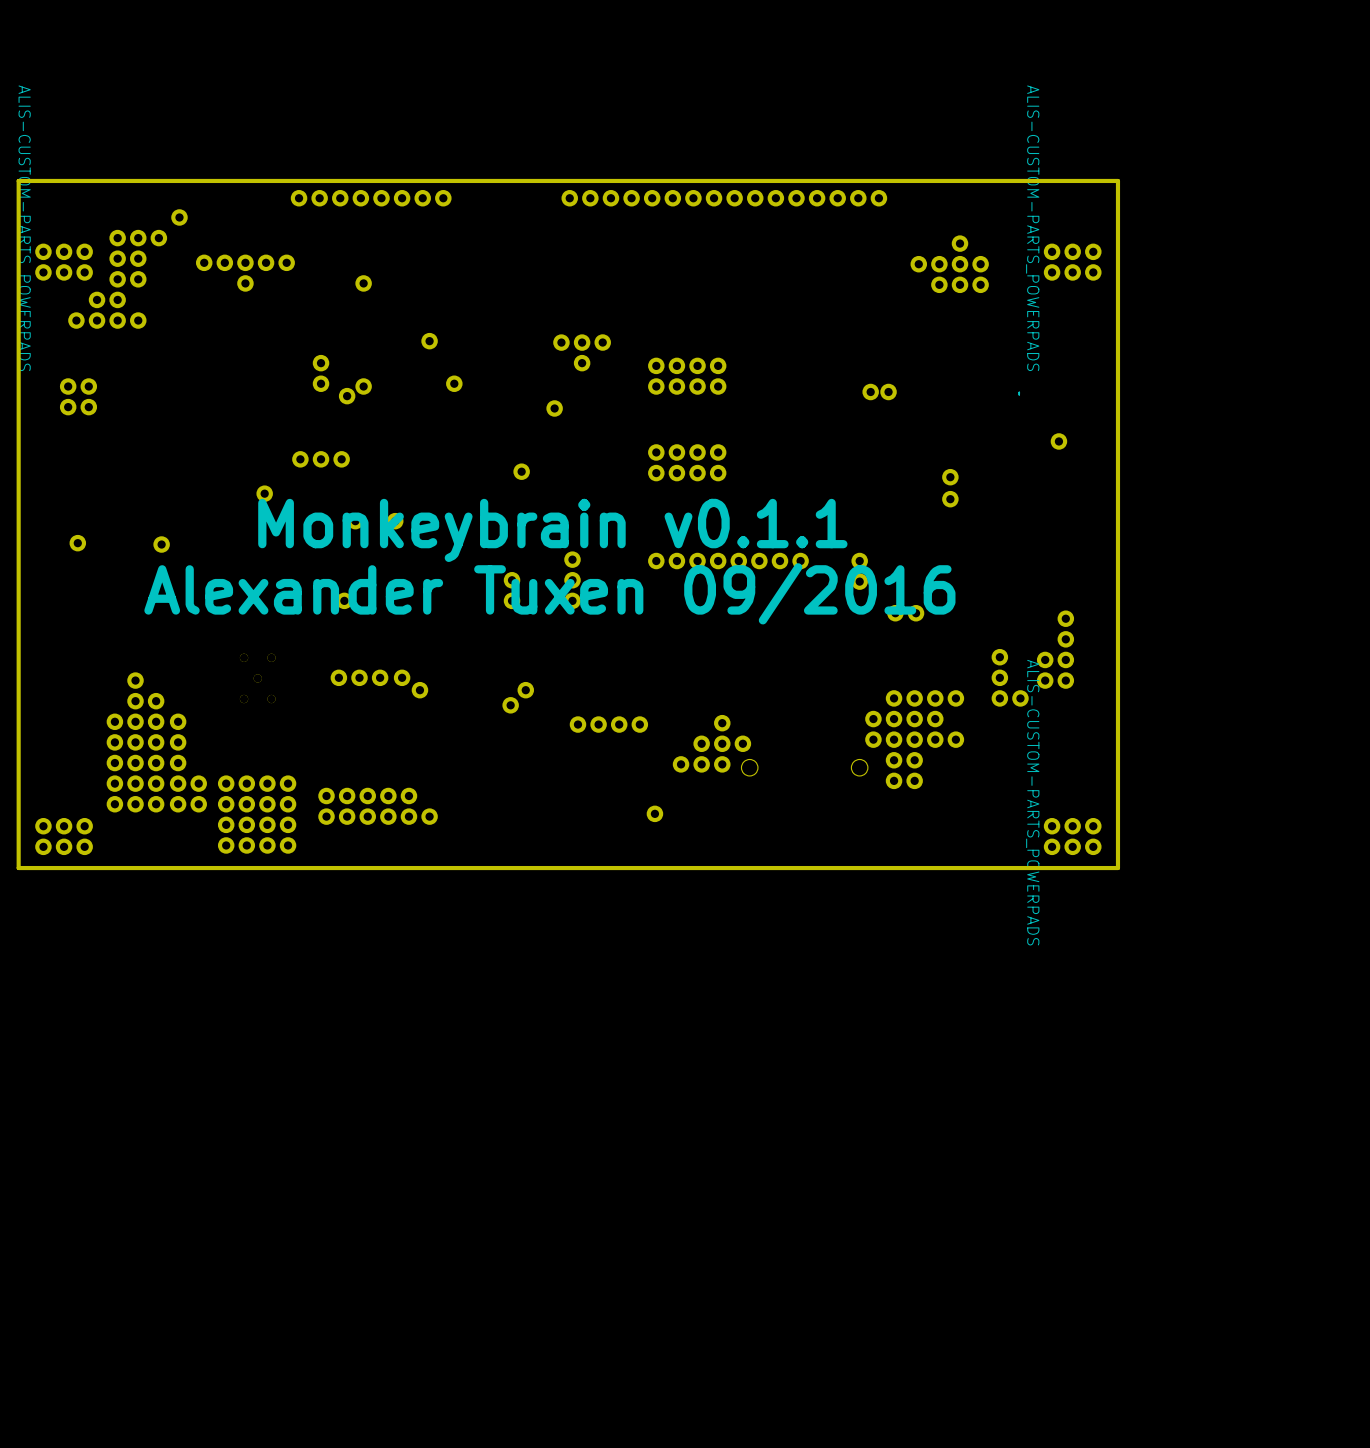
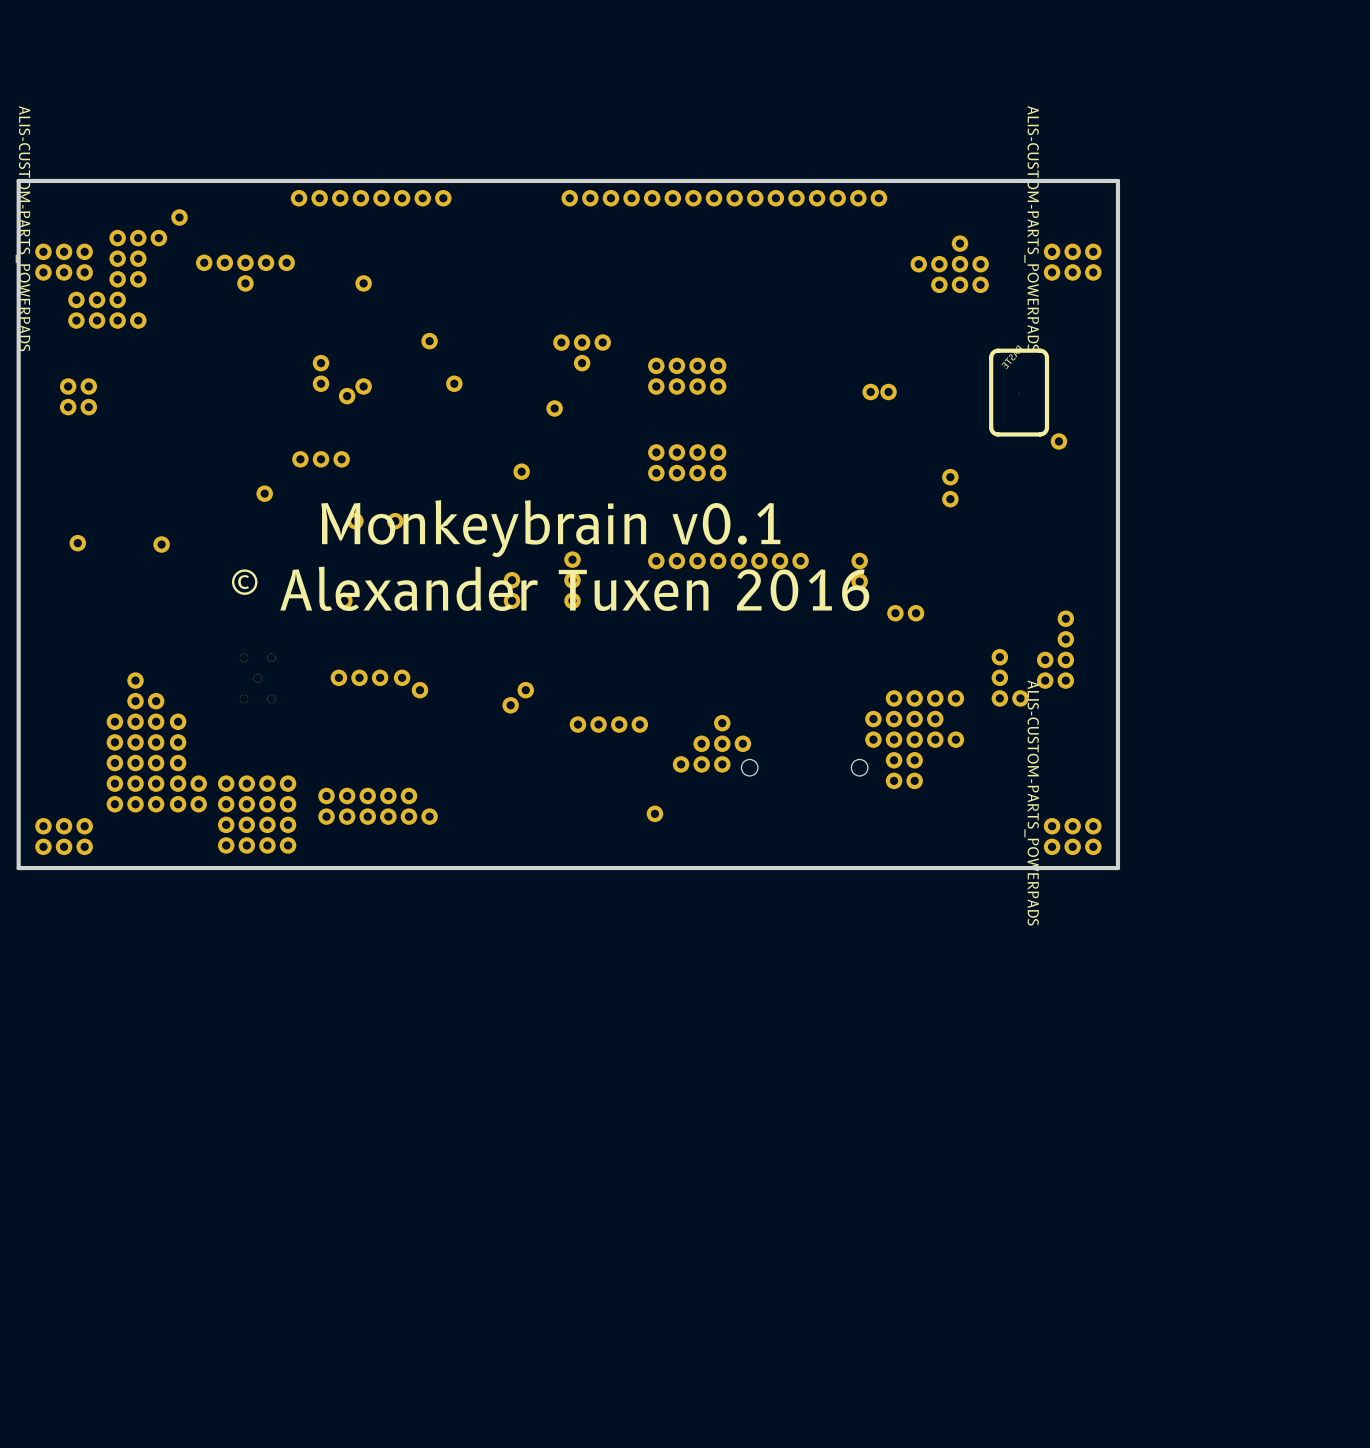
part: none -> (76, 299)
part footprint: [1019, 392, 1020, 396] -> [989, 348, 1050, 437]
text: Monkeybrain v0.1.1 (552, 530) -> Monkeybrain v0.1 (550, 528)
text: Alexander Tuxen 09/2016 (549, 593) -> © Alexander Tuxen 2016 (550, 588)

